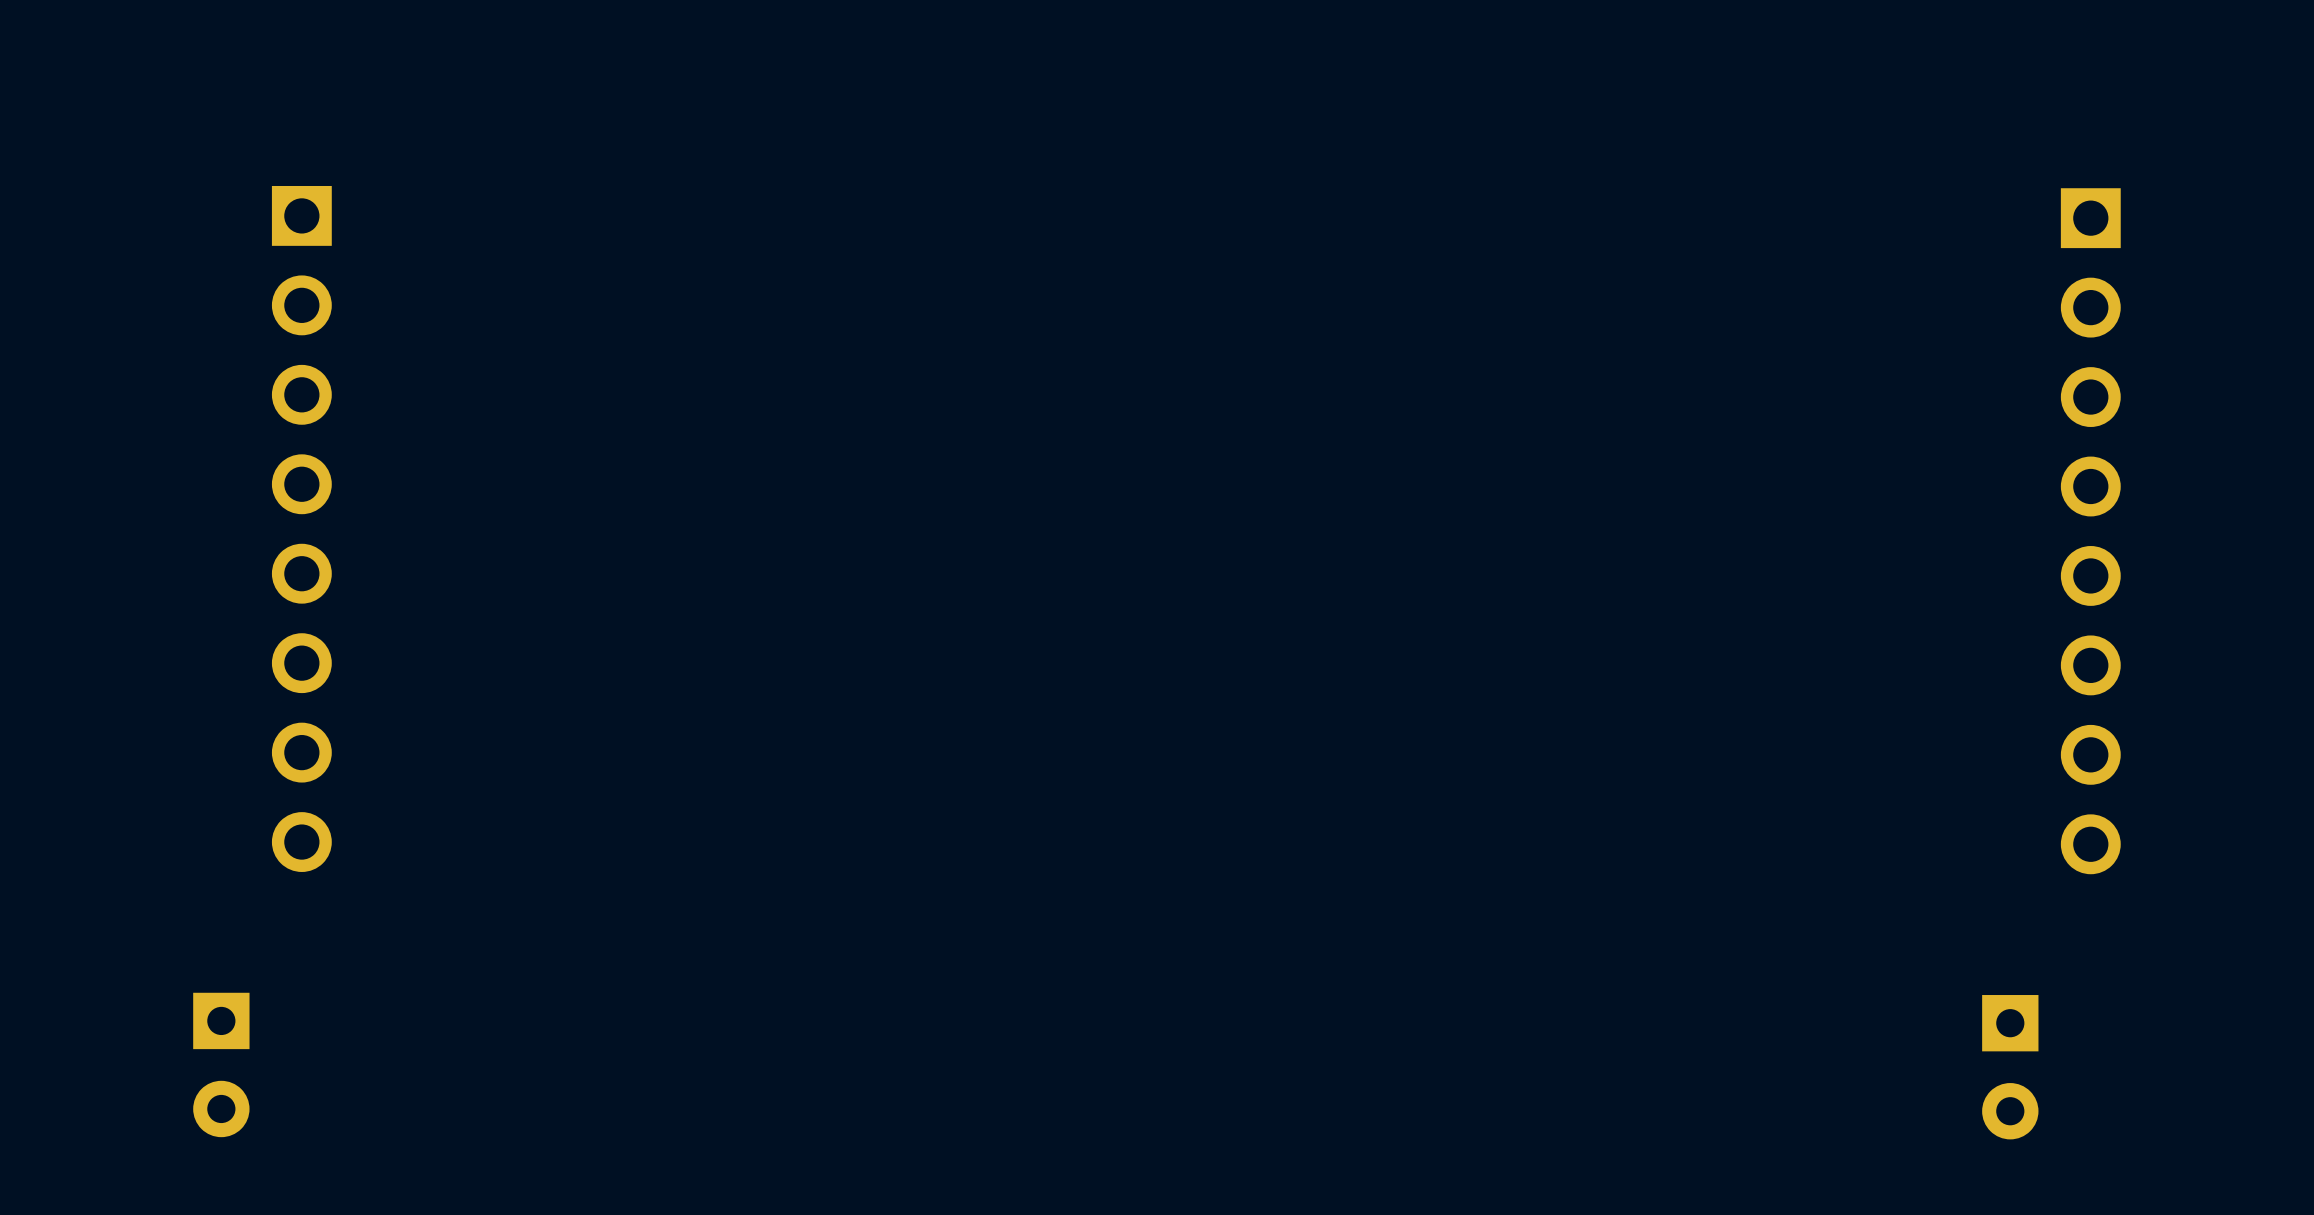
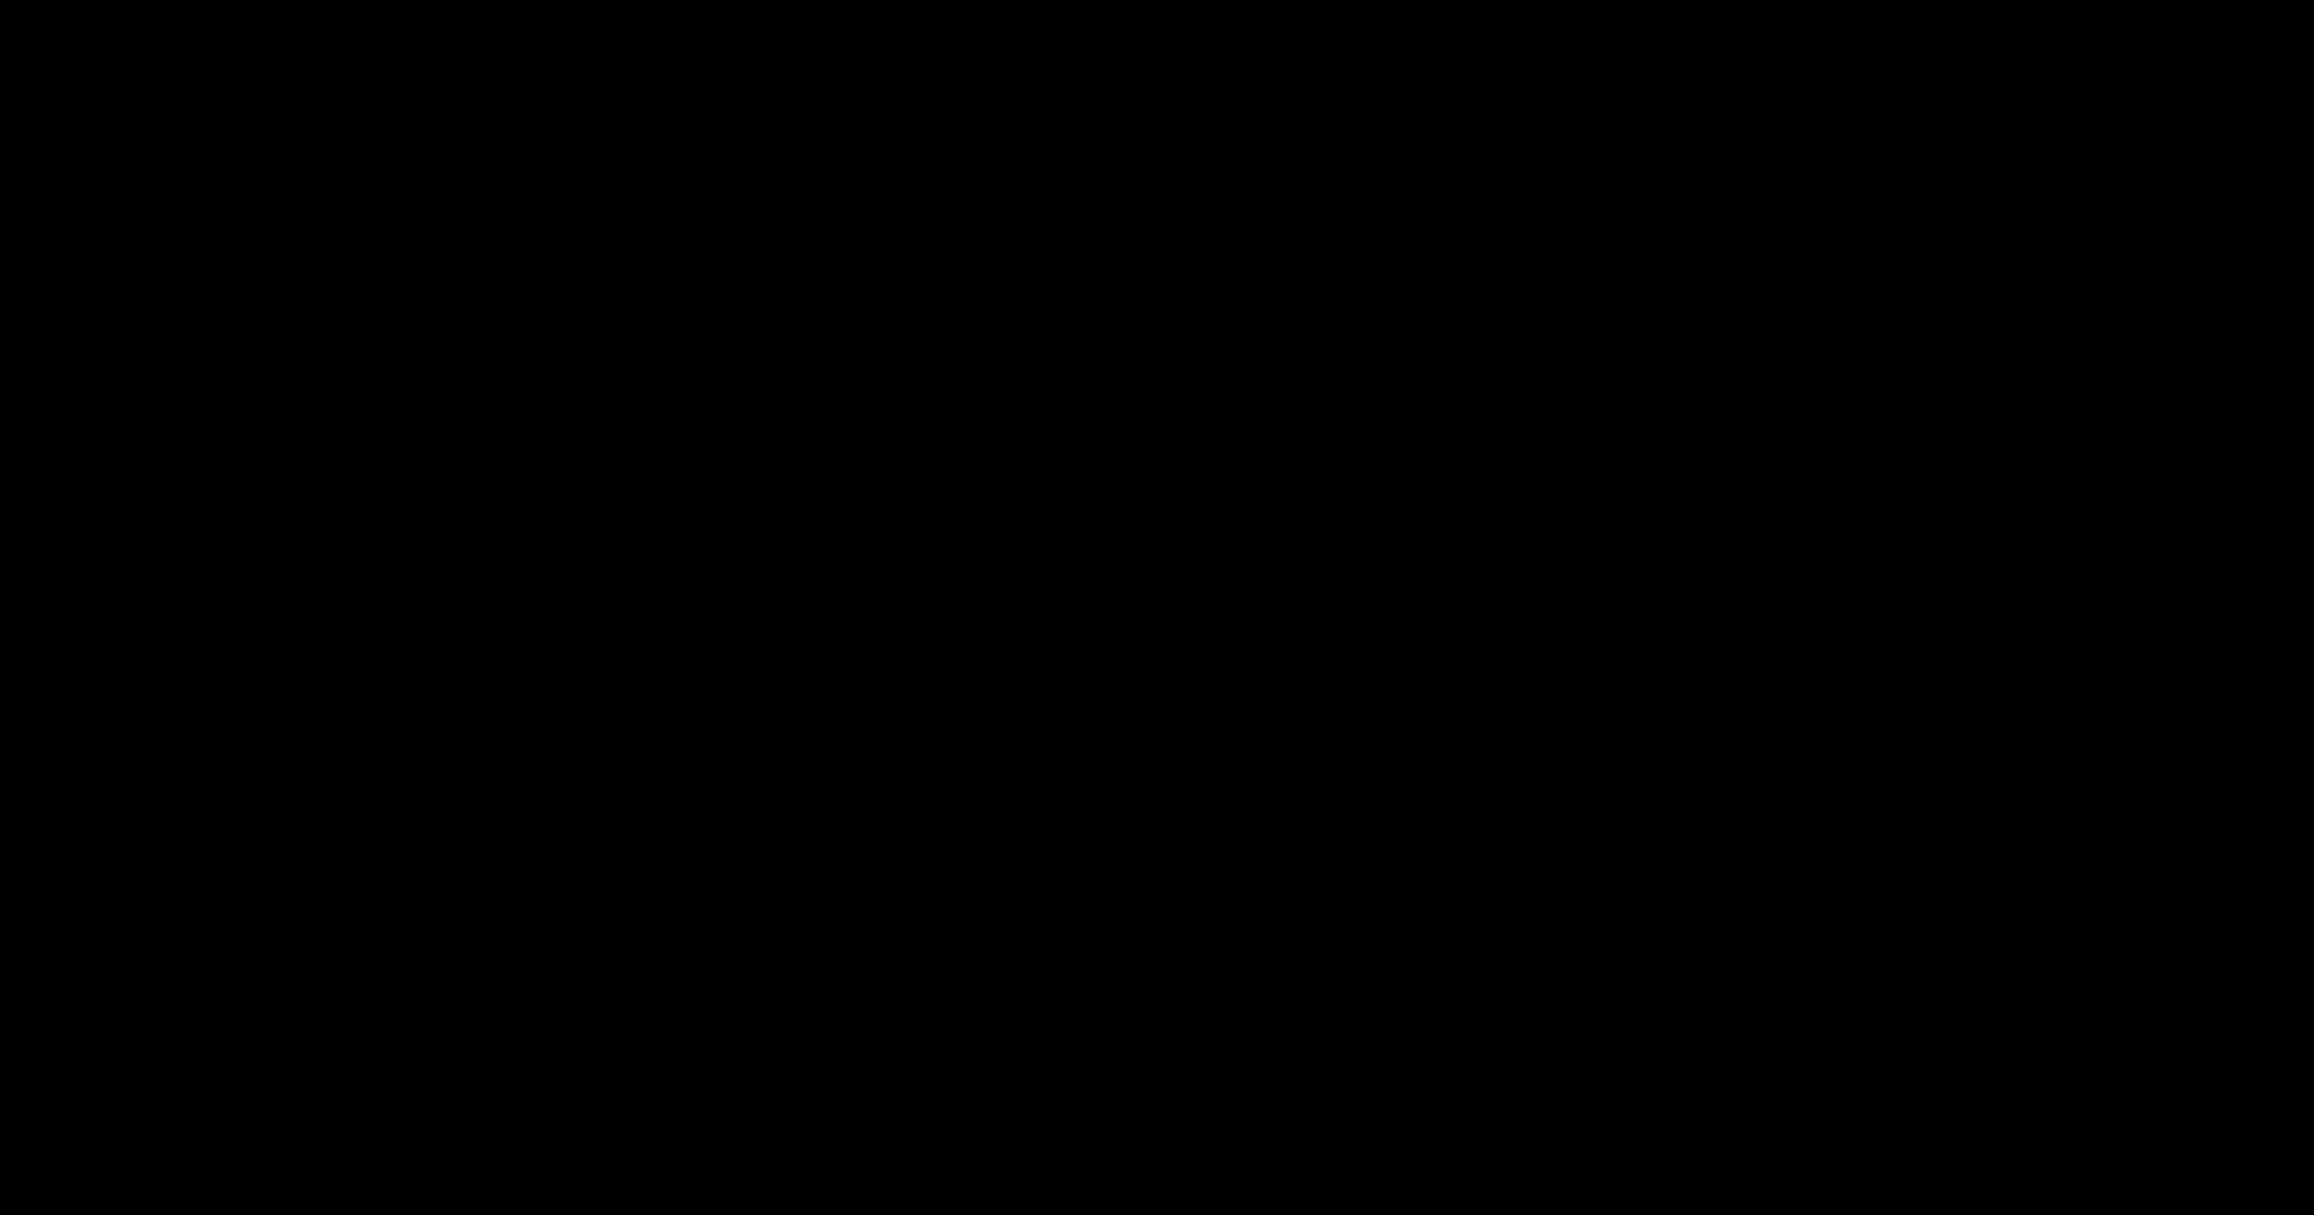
part: (301, 528) -> none
part: (2090, 531) -> none
part: (221, 1064) -> none
part: (2010, 1067) -> none

